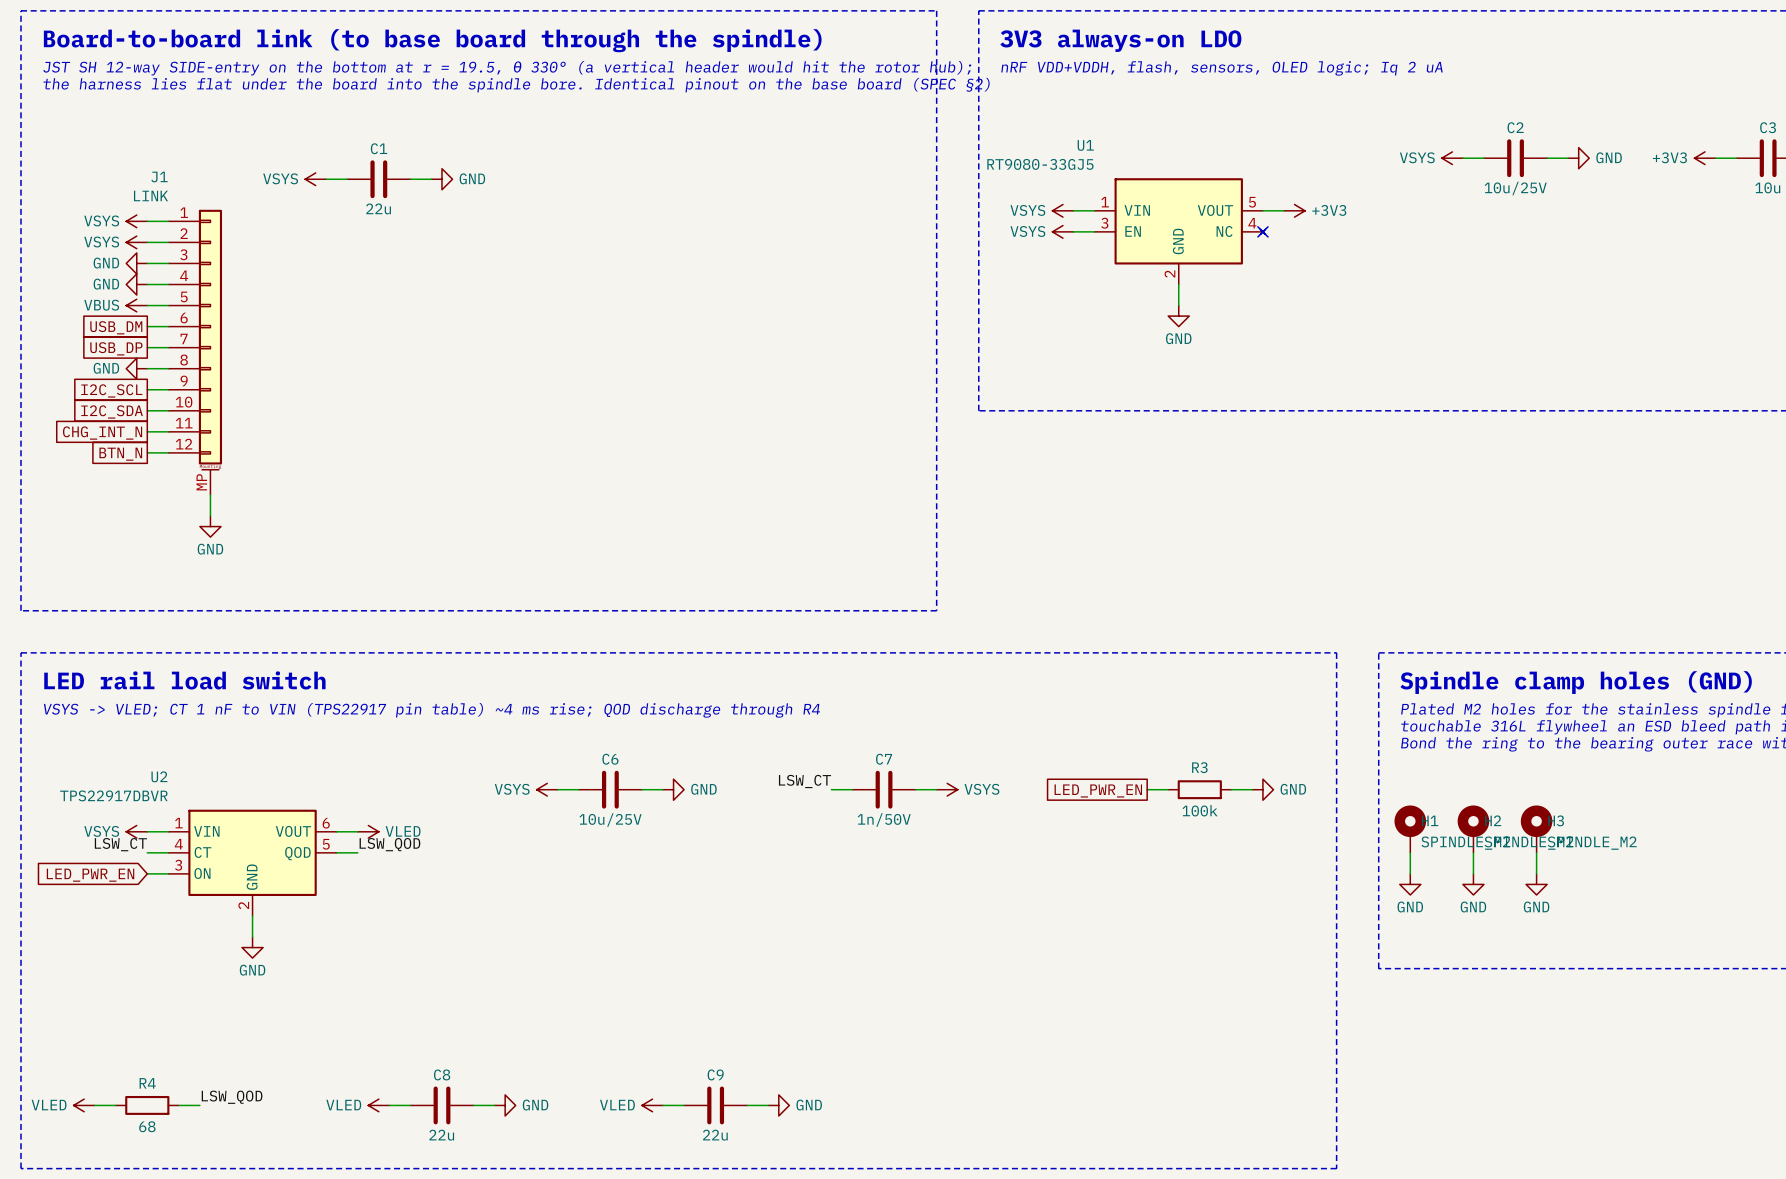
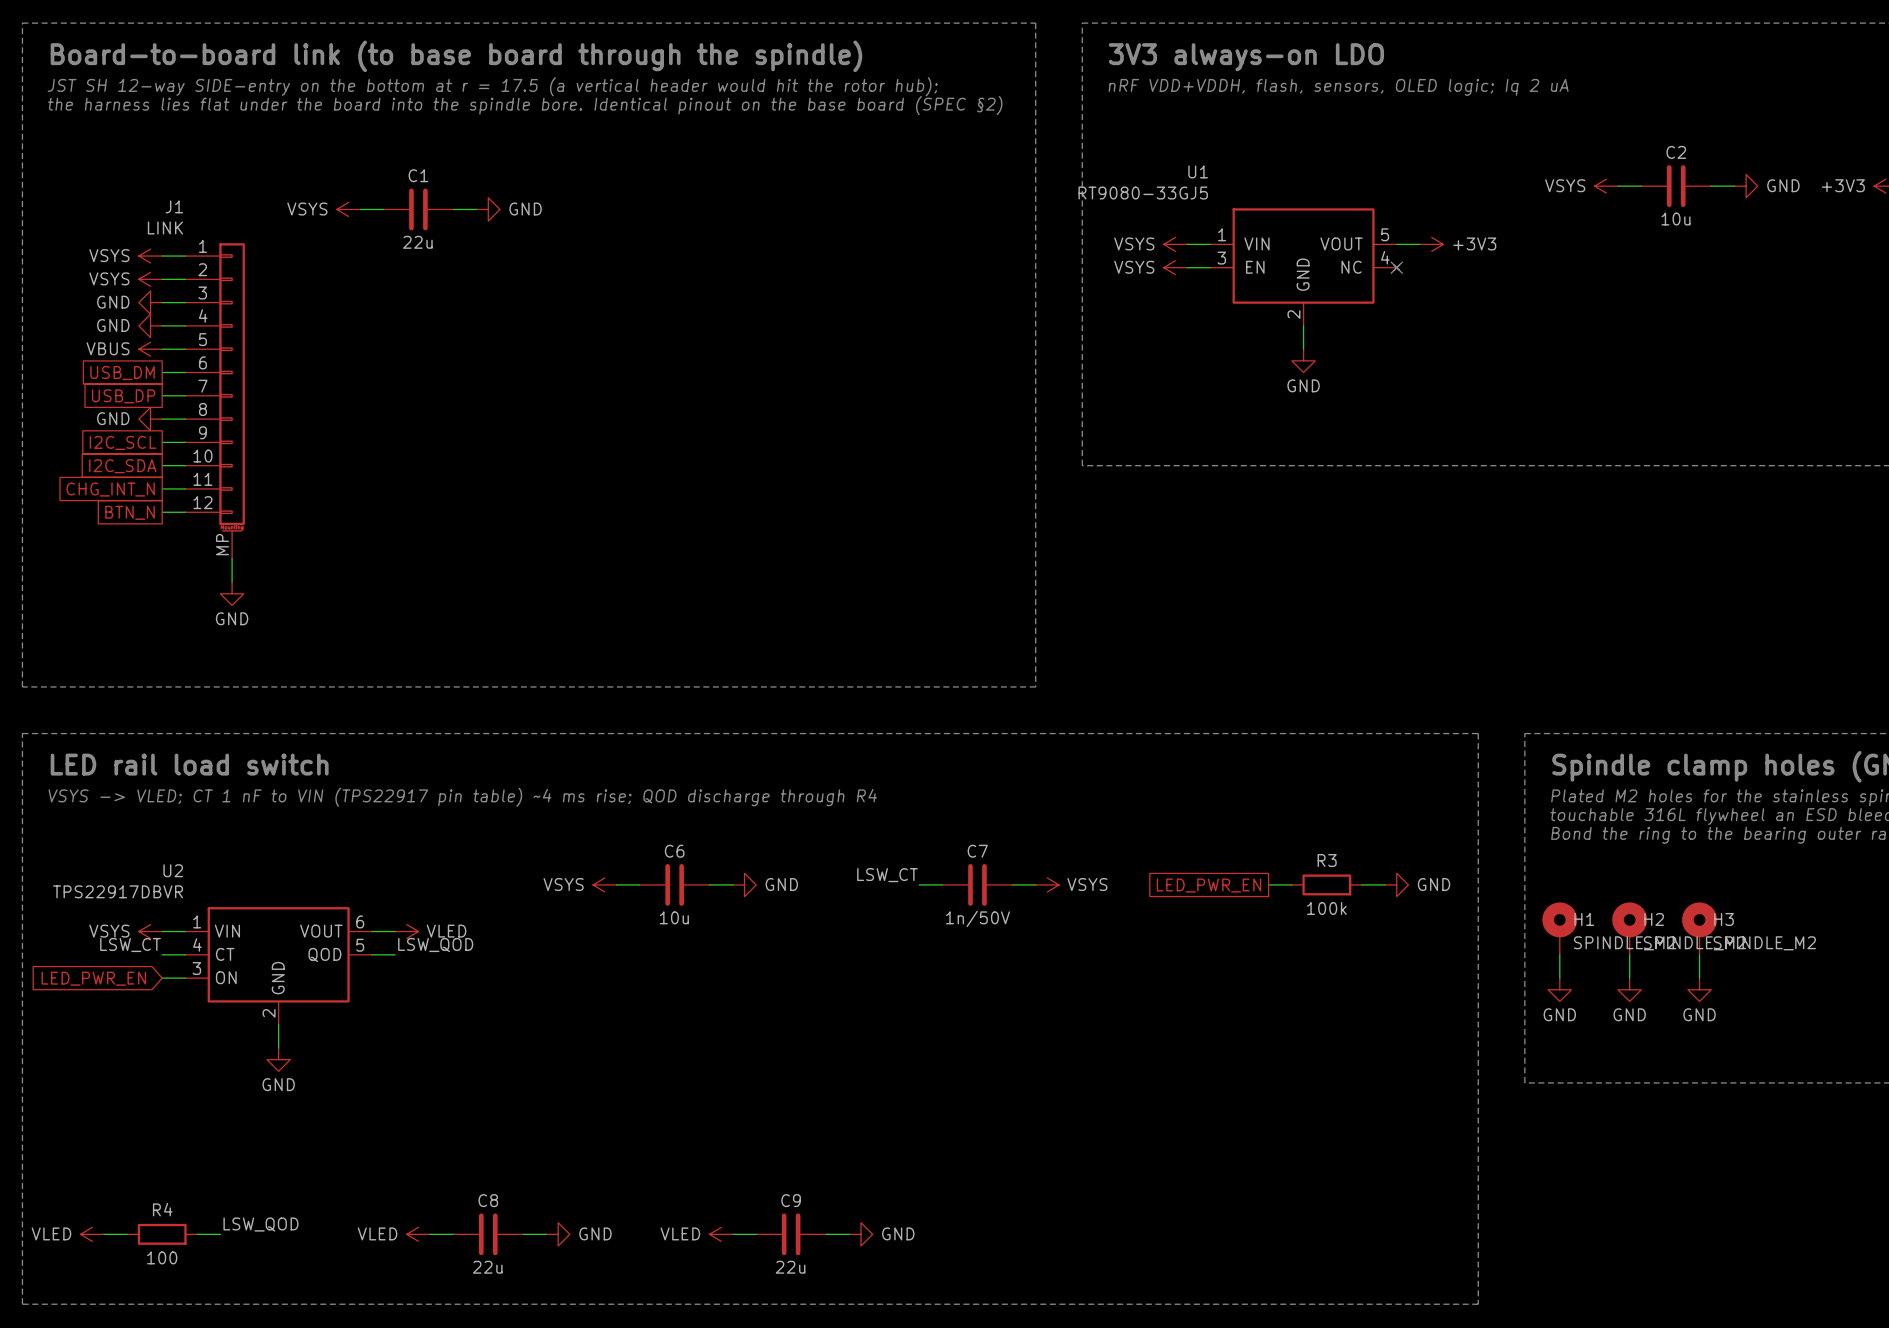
text: JST SH 12-way SIDE-entry on the bottom at r = 19.5, θ 330° (a vertical header would hit the rotor hub); (507, 68) -> JST SH 12-way SIDE-entry on the bottom at r = 17.5 (a vertical header would hit the rotor hub); (492, 86)
C2 value: 10u/25V (1515, 188) -> 10u (1675, 219)
C6 value: 10u/25V (610, 819) -> 10u (674, 917)
R4 value: 68 (147, 1126) -> 100 (162, 1257)

